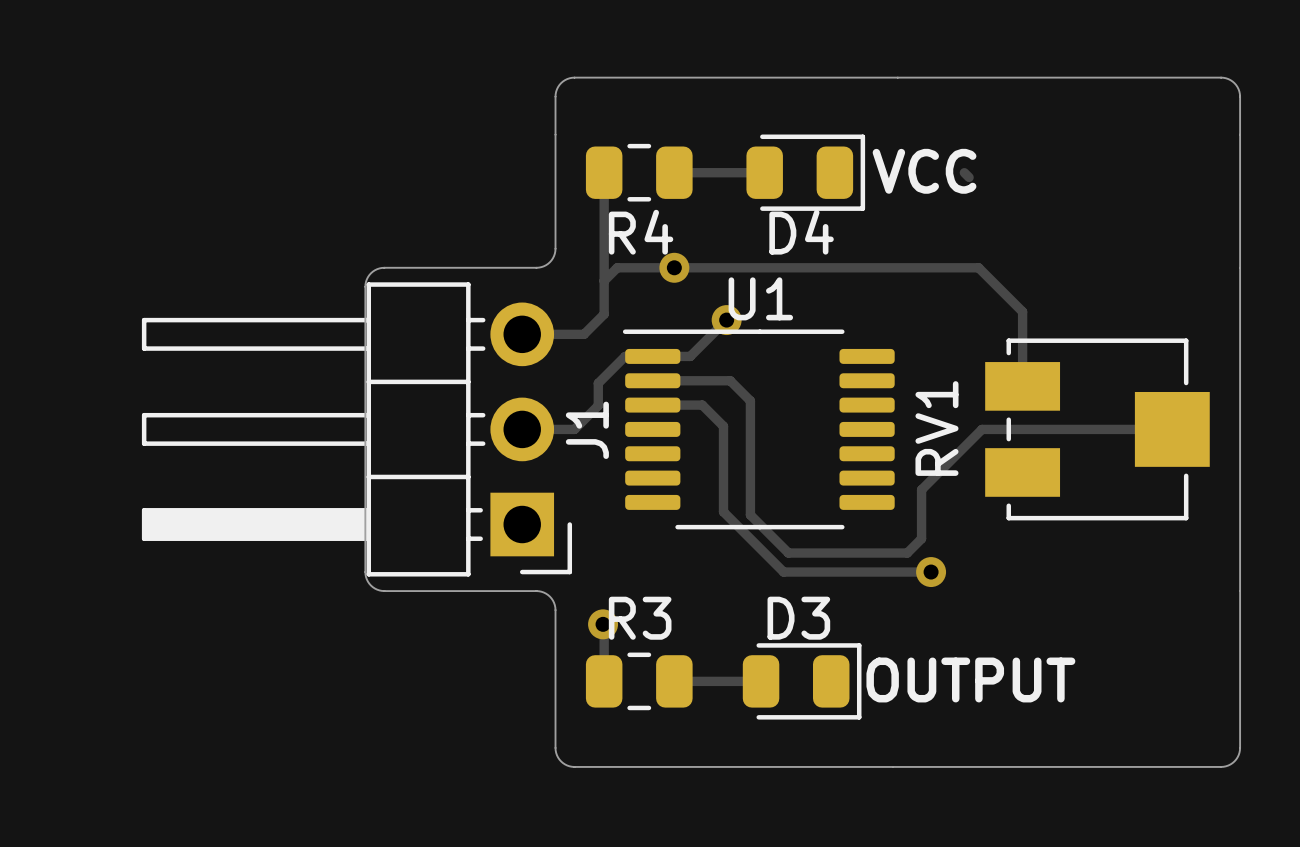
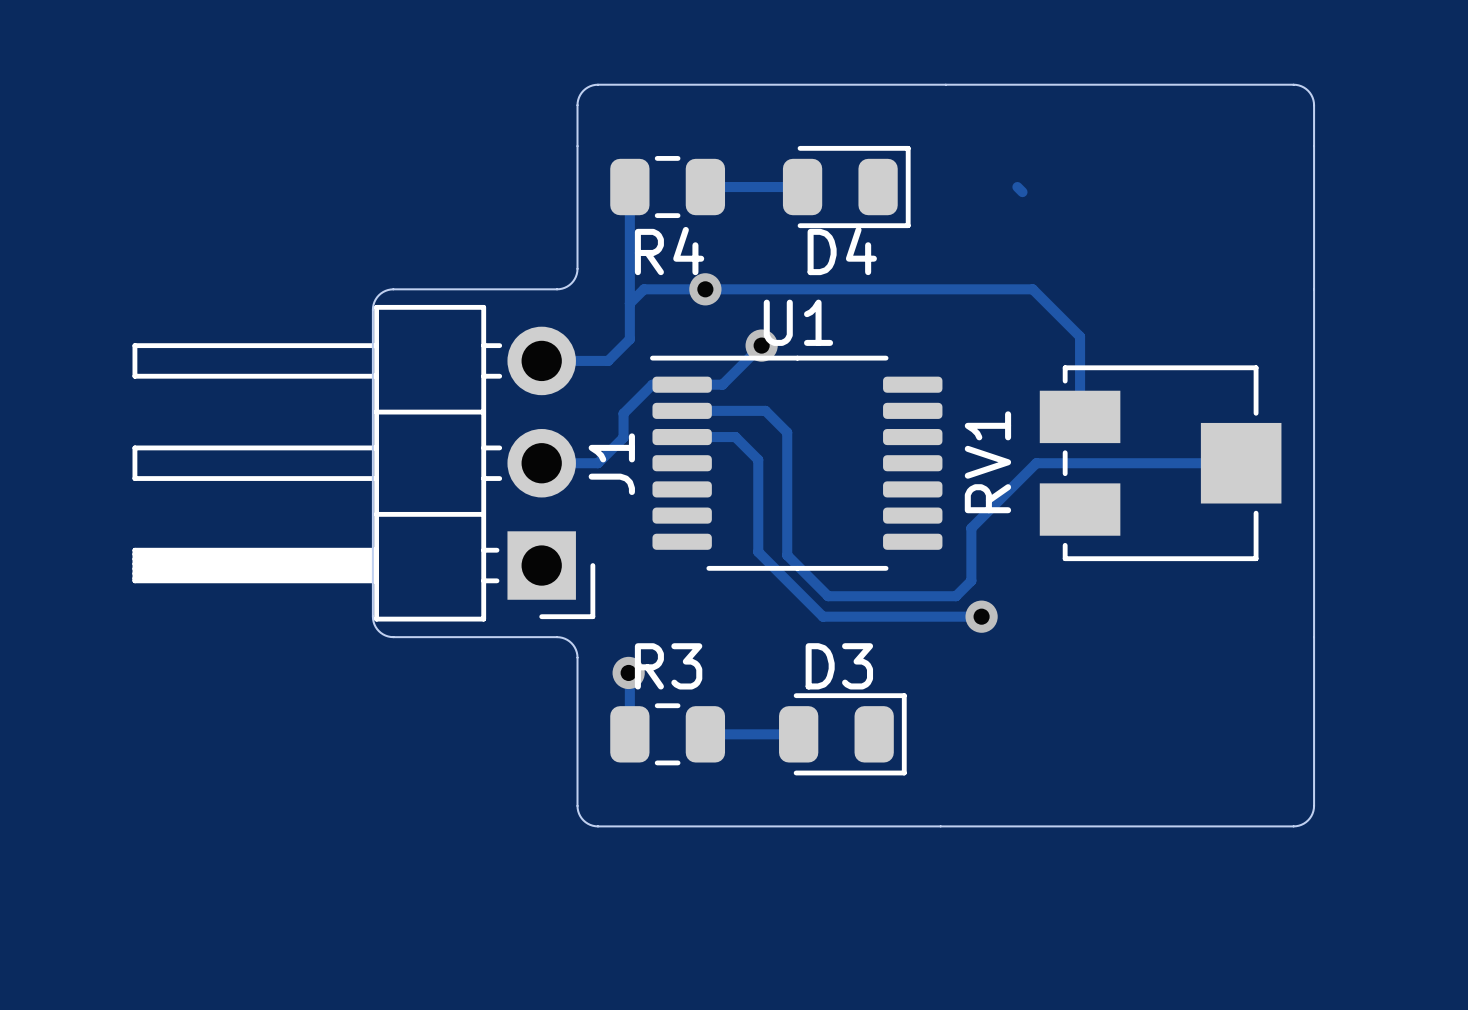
text: VCC (924, 171) -> none
text: OUTPUT (970, 679) -> none

